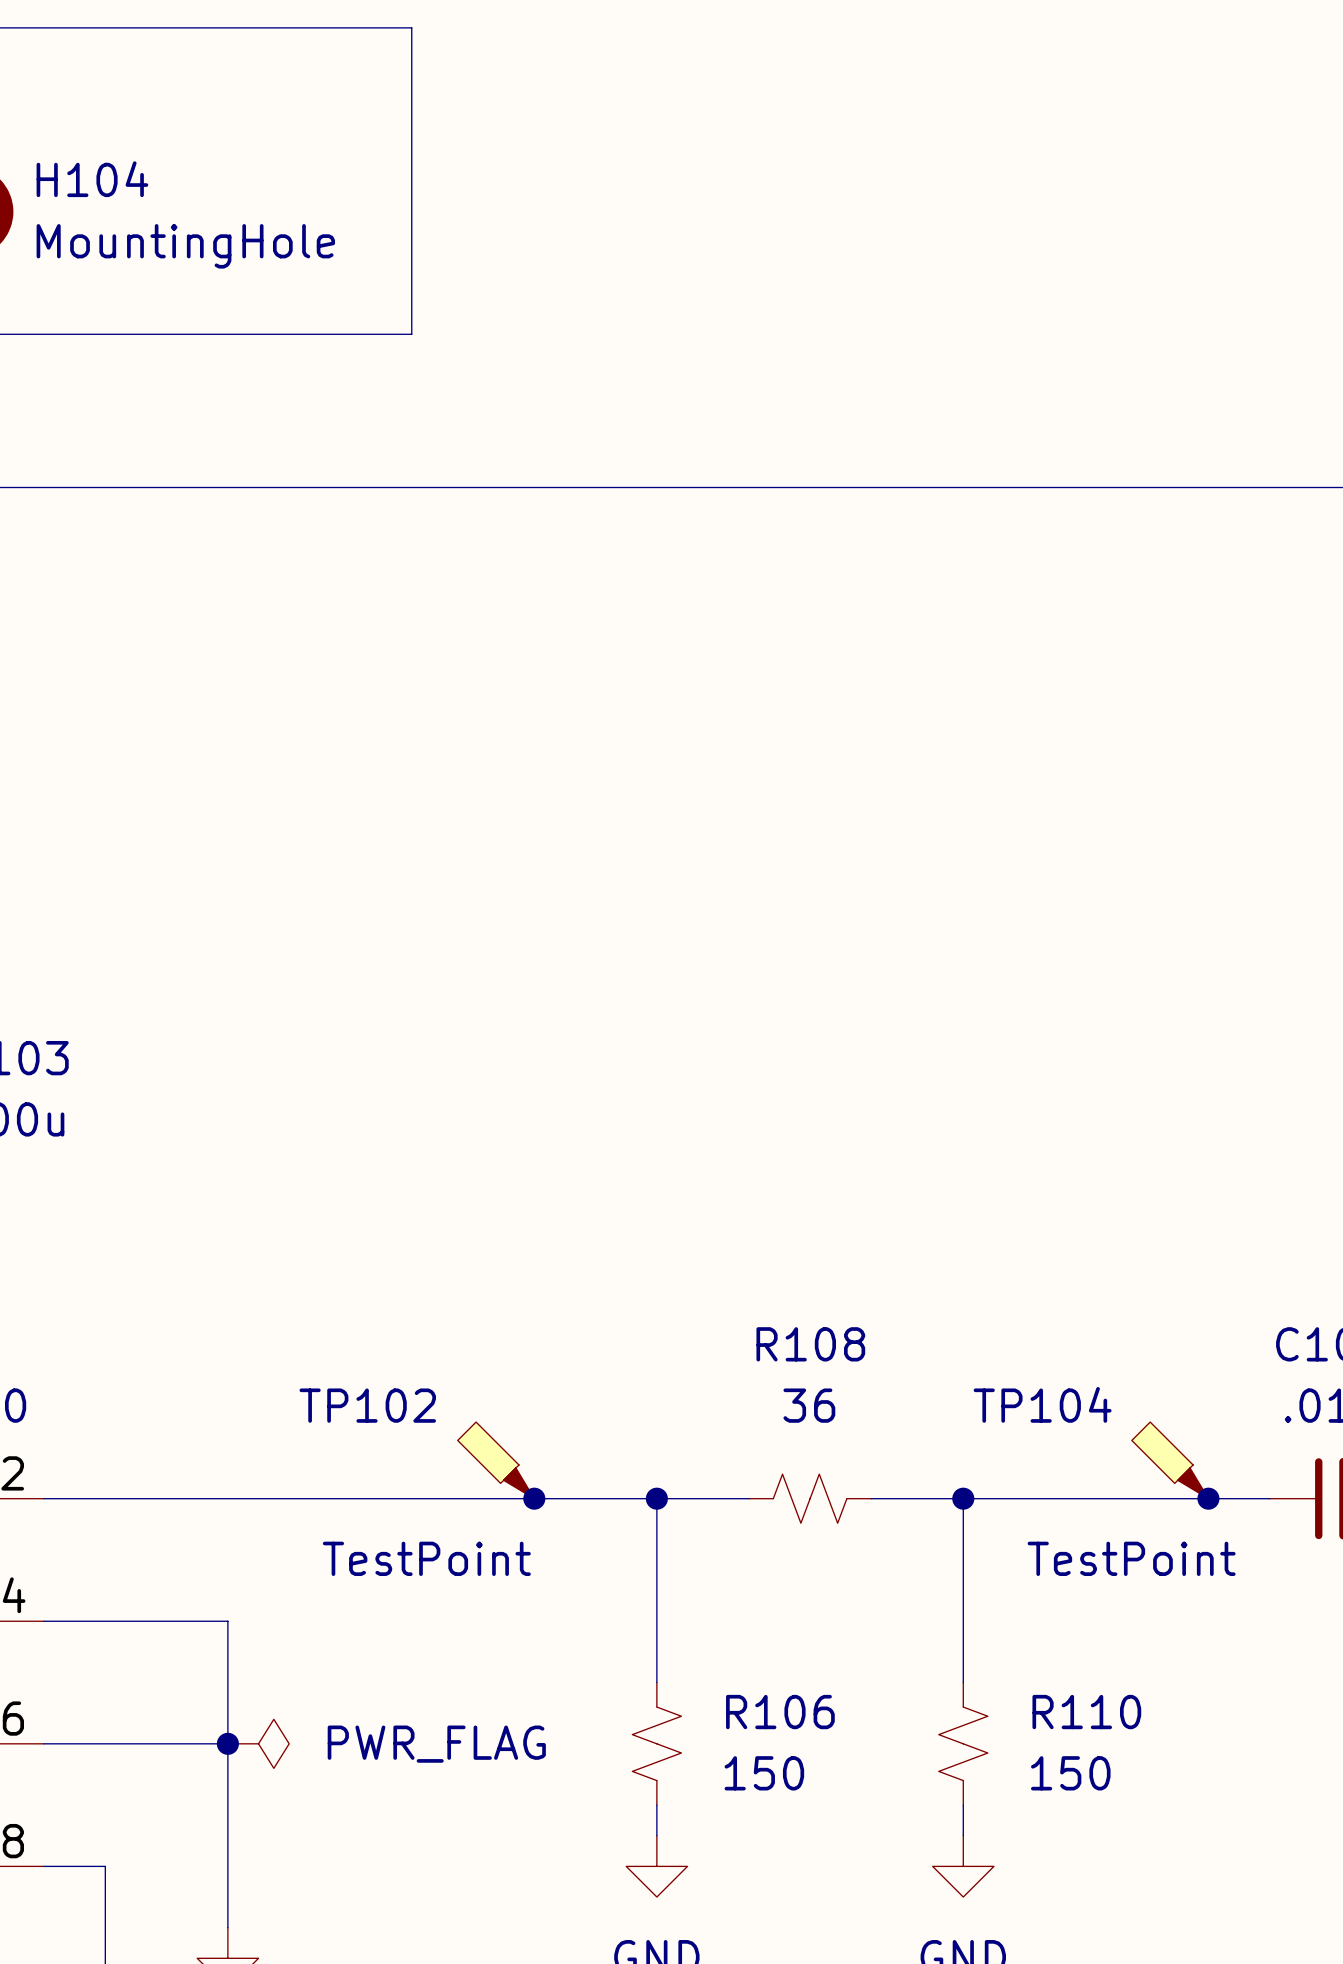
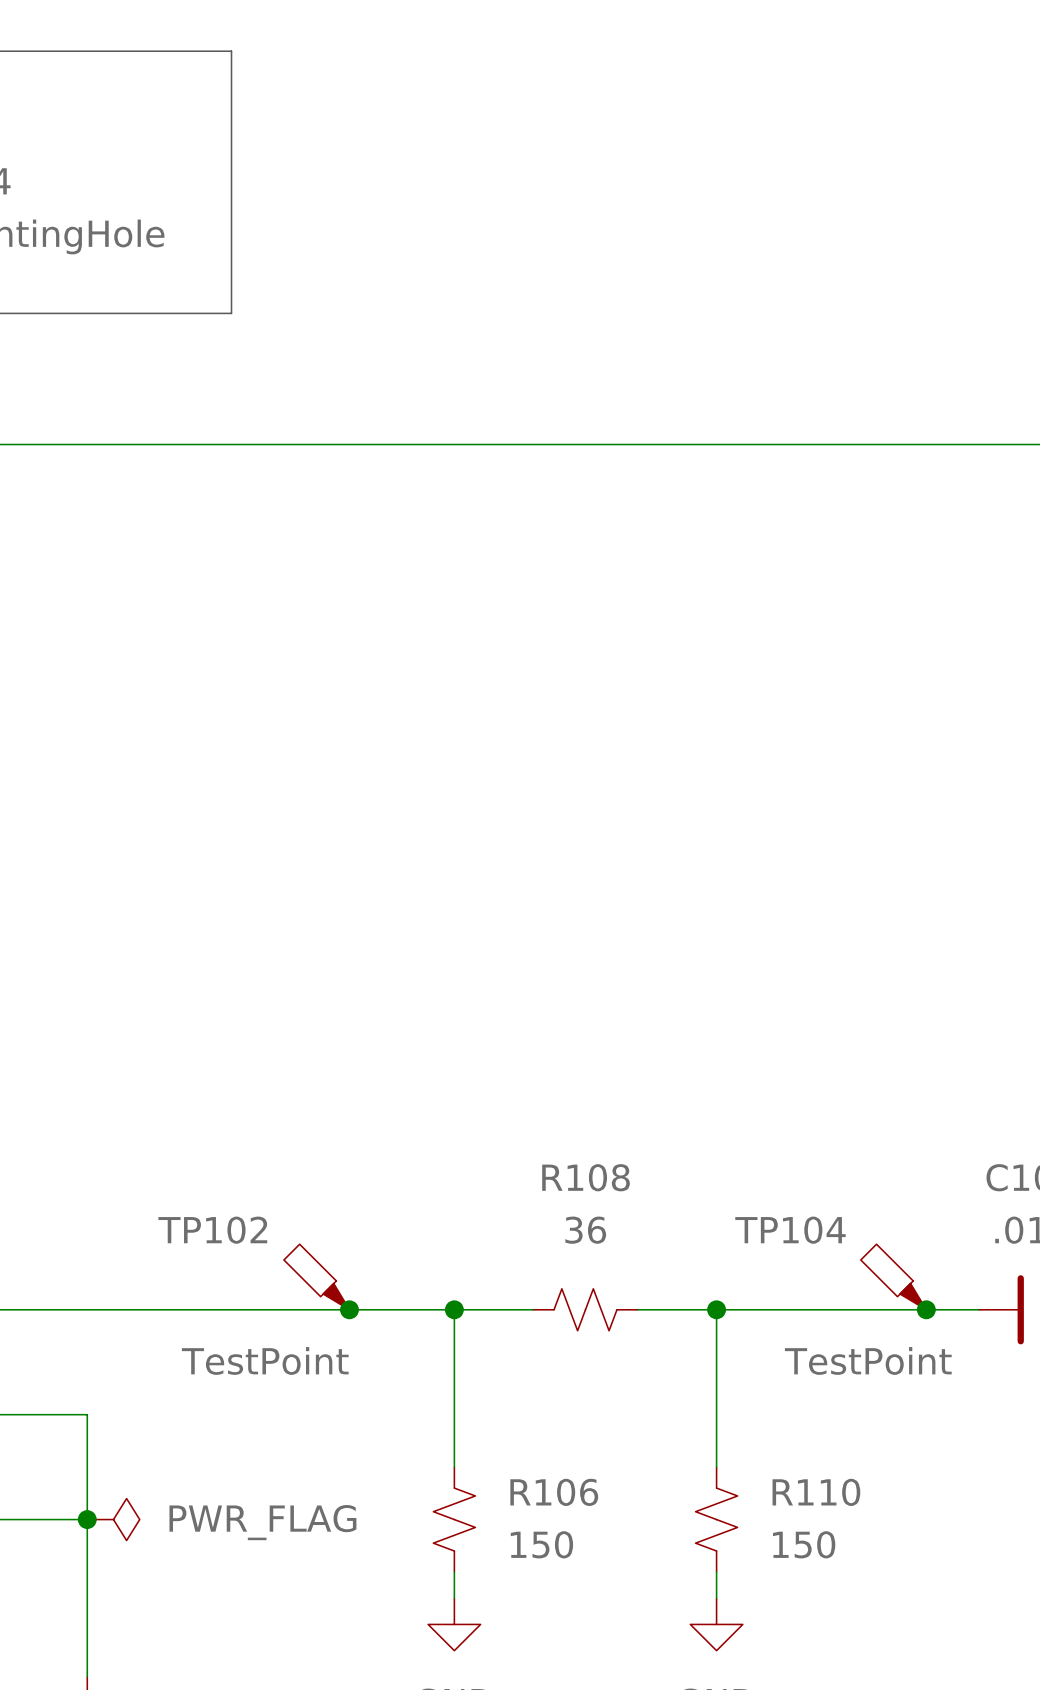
line: (396, 27) (411, 27) (411, 334) (396, 334) -> (231, 51) (231, 313)

